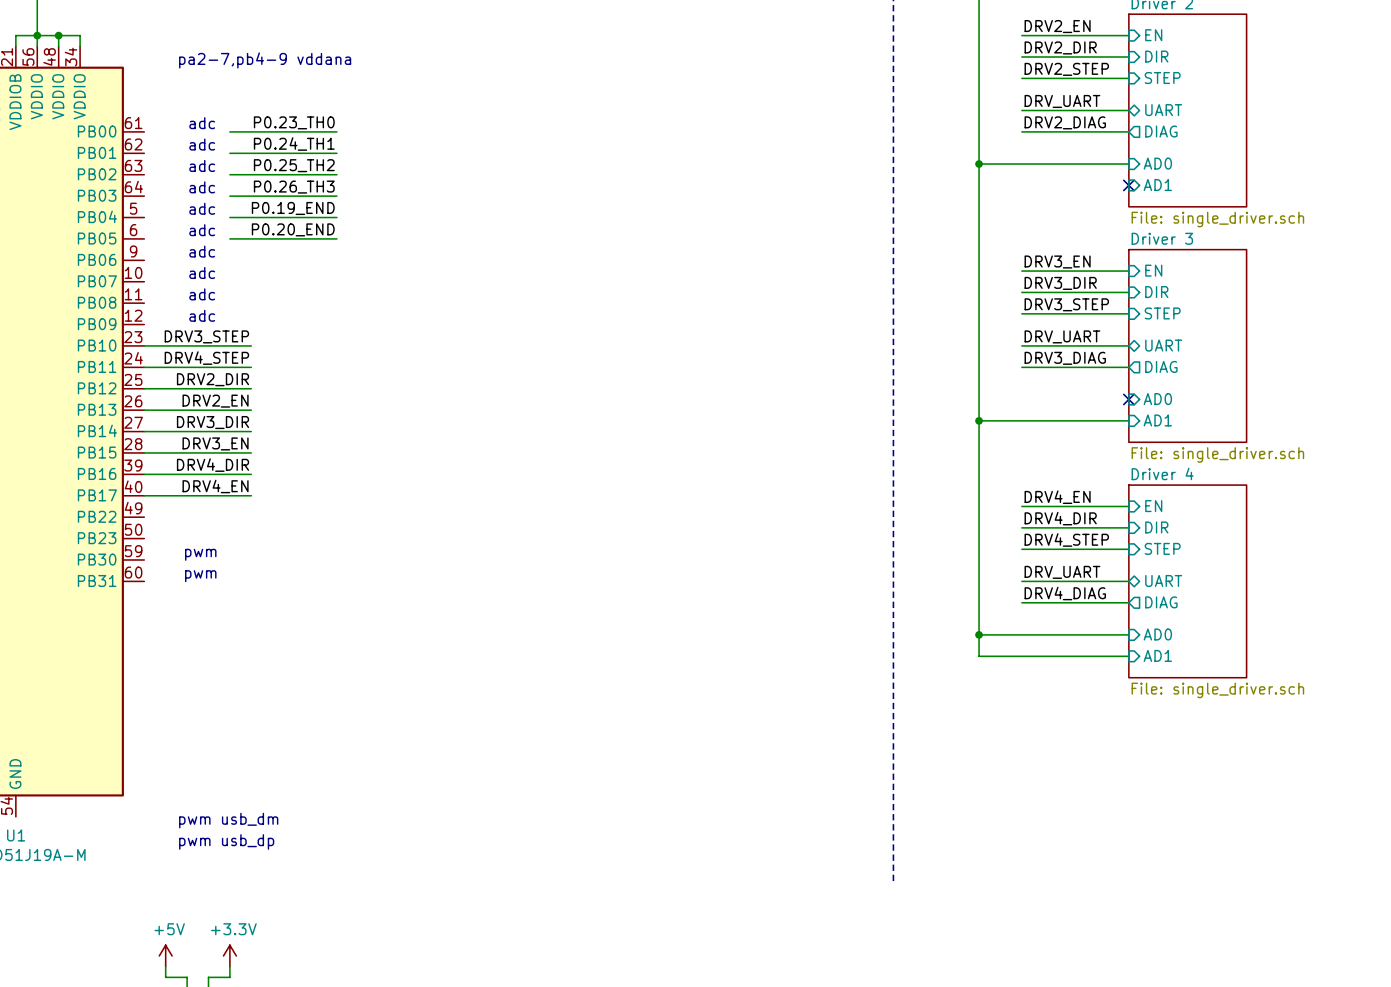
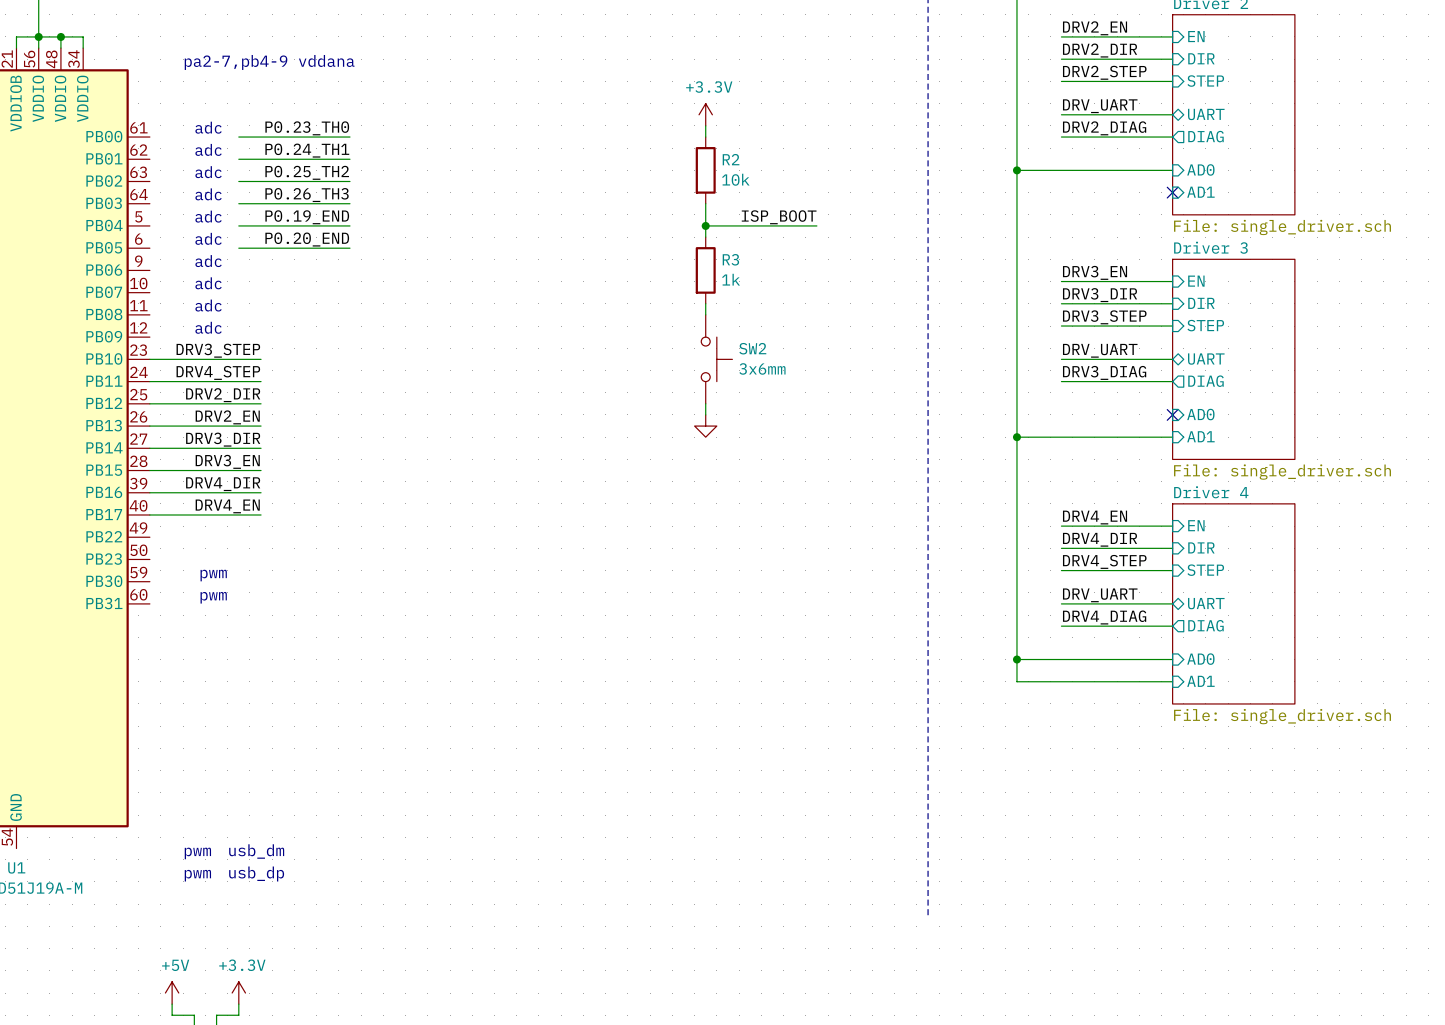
power symbol: none -> +3.3V (705, 114)
wire: none -> (705, 125) (705, 137)
R2: none -> 10k (705, 170)
wire: none -> (705, 203) (705, 237)
label: none -> ISP_BOOT (779, 217)
wire: none -> (705, 225) (816, 225)
junction: none -> (705, 225)
R3: none -> 1k (705, 270)
wire: none -> (705, 303) (705, 314)
SW2: none -> 3x6mm (716, 359)
wire: none -> (705, 403) (705, 414)
power symbol: none -> (705, 426)

